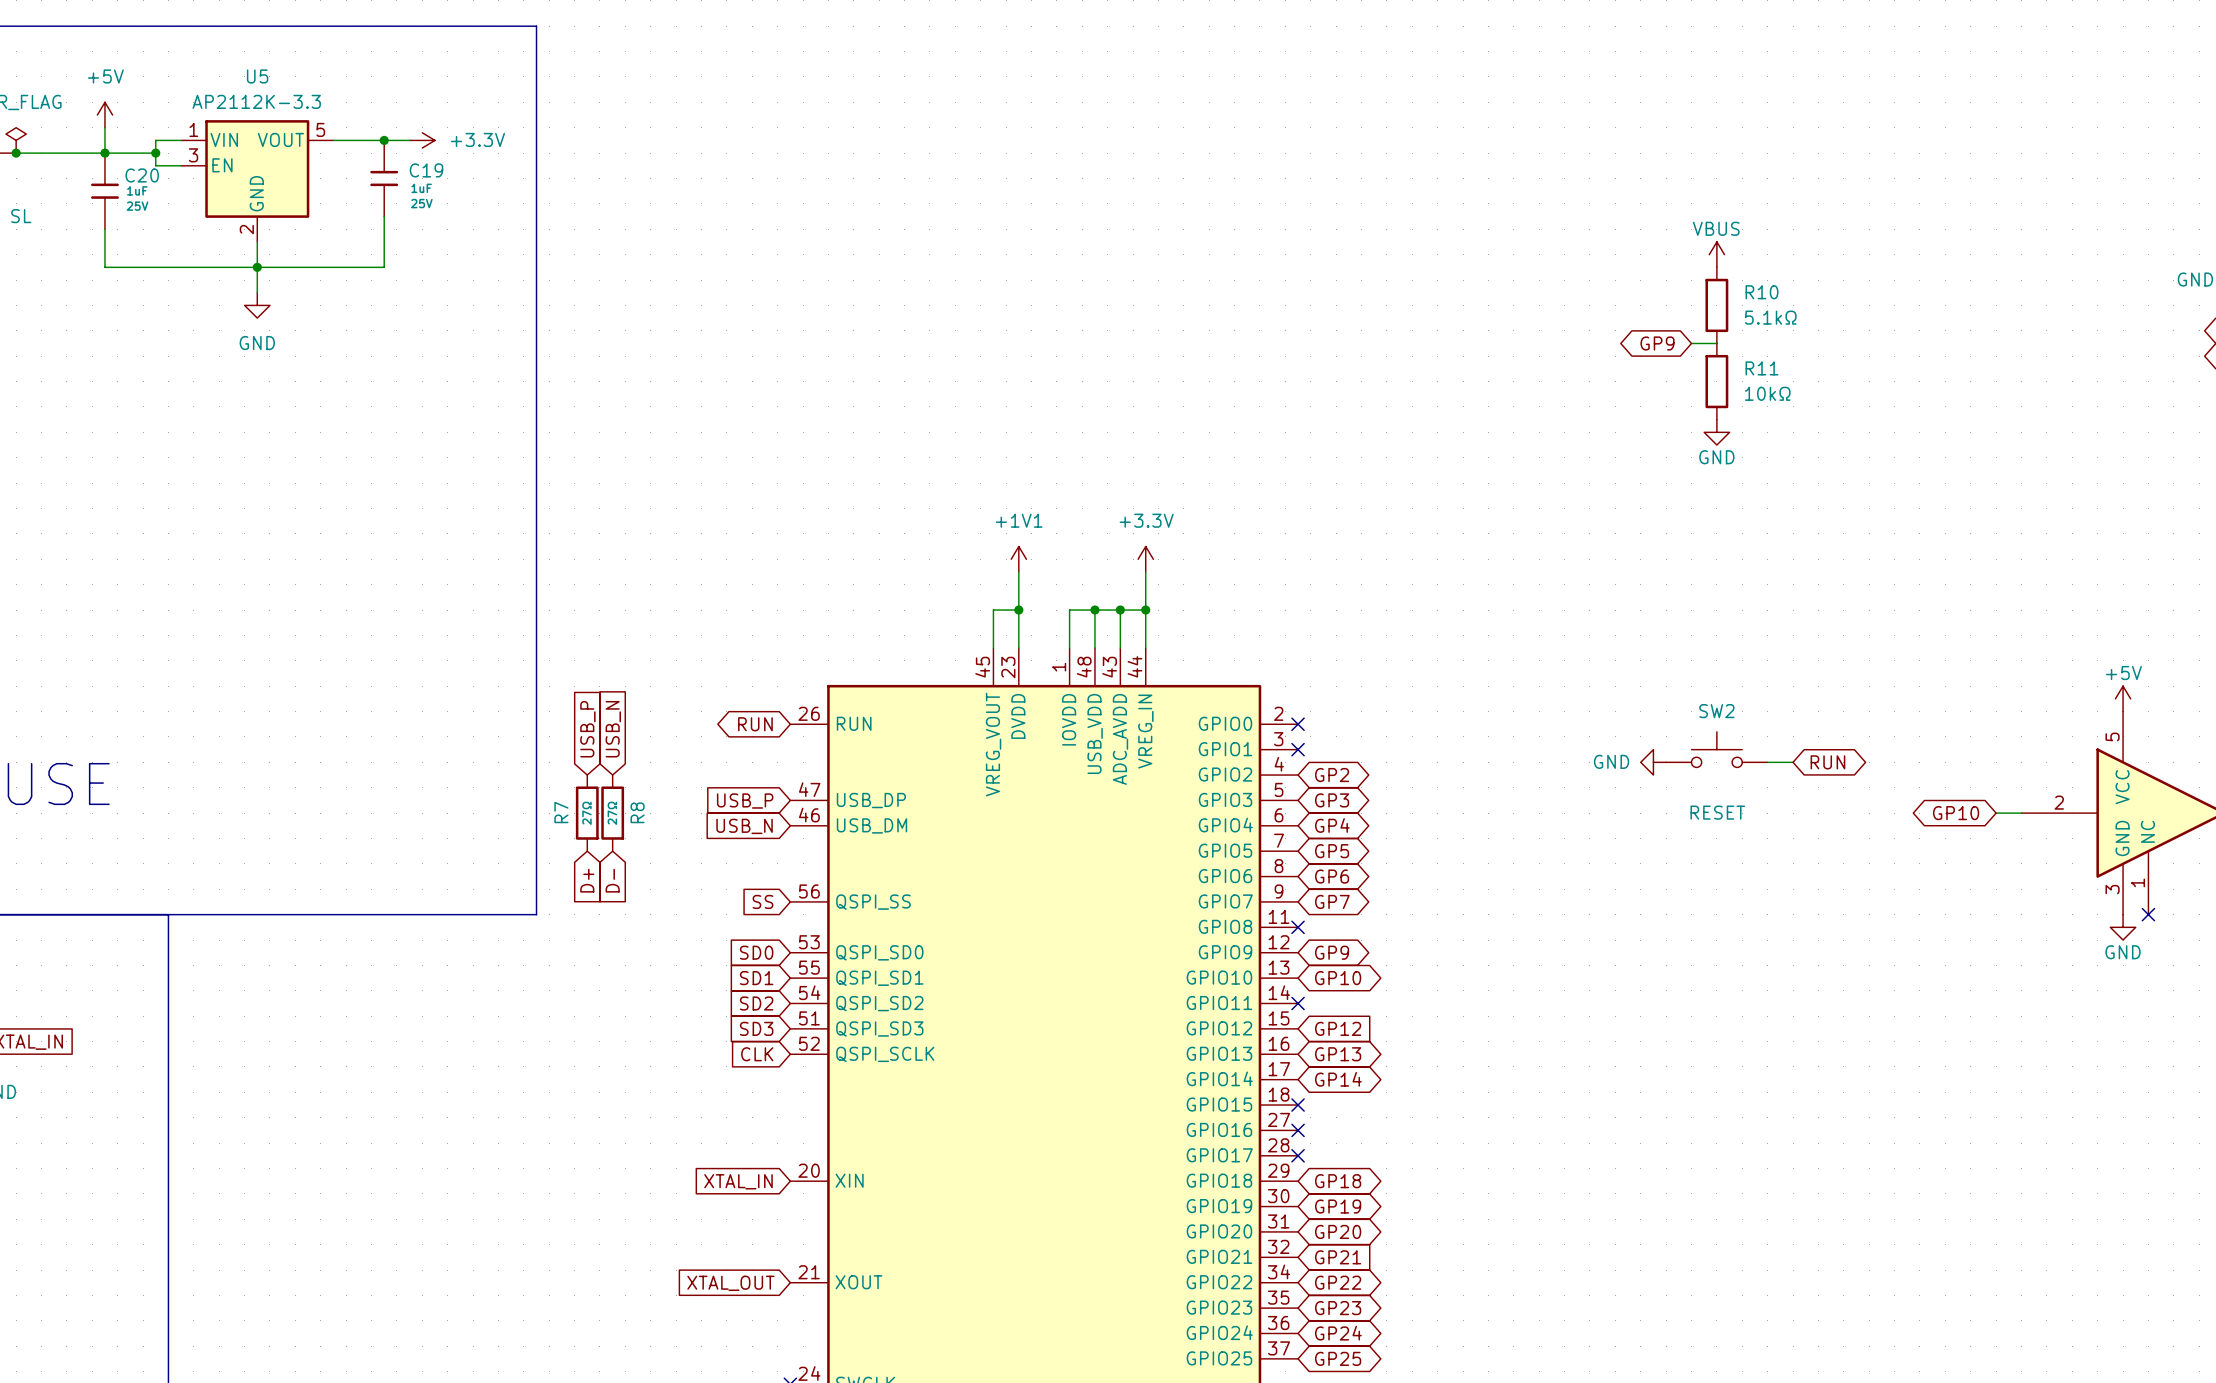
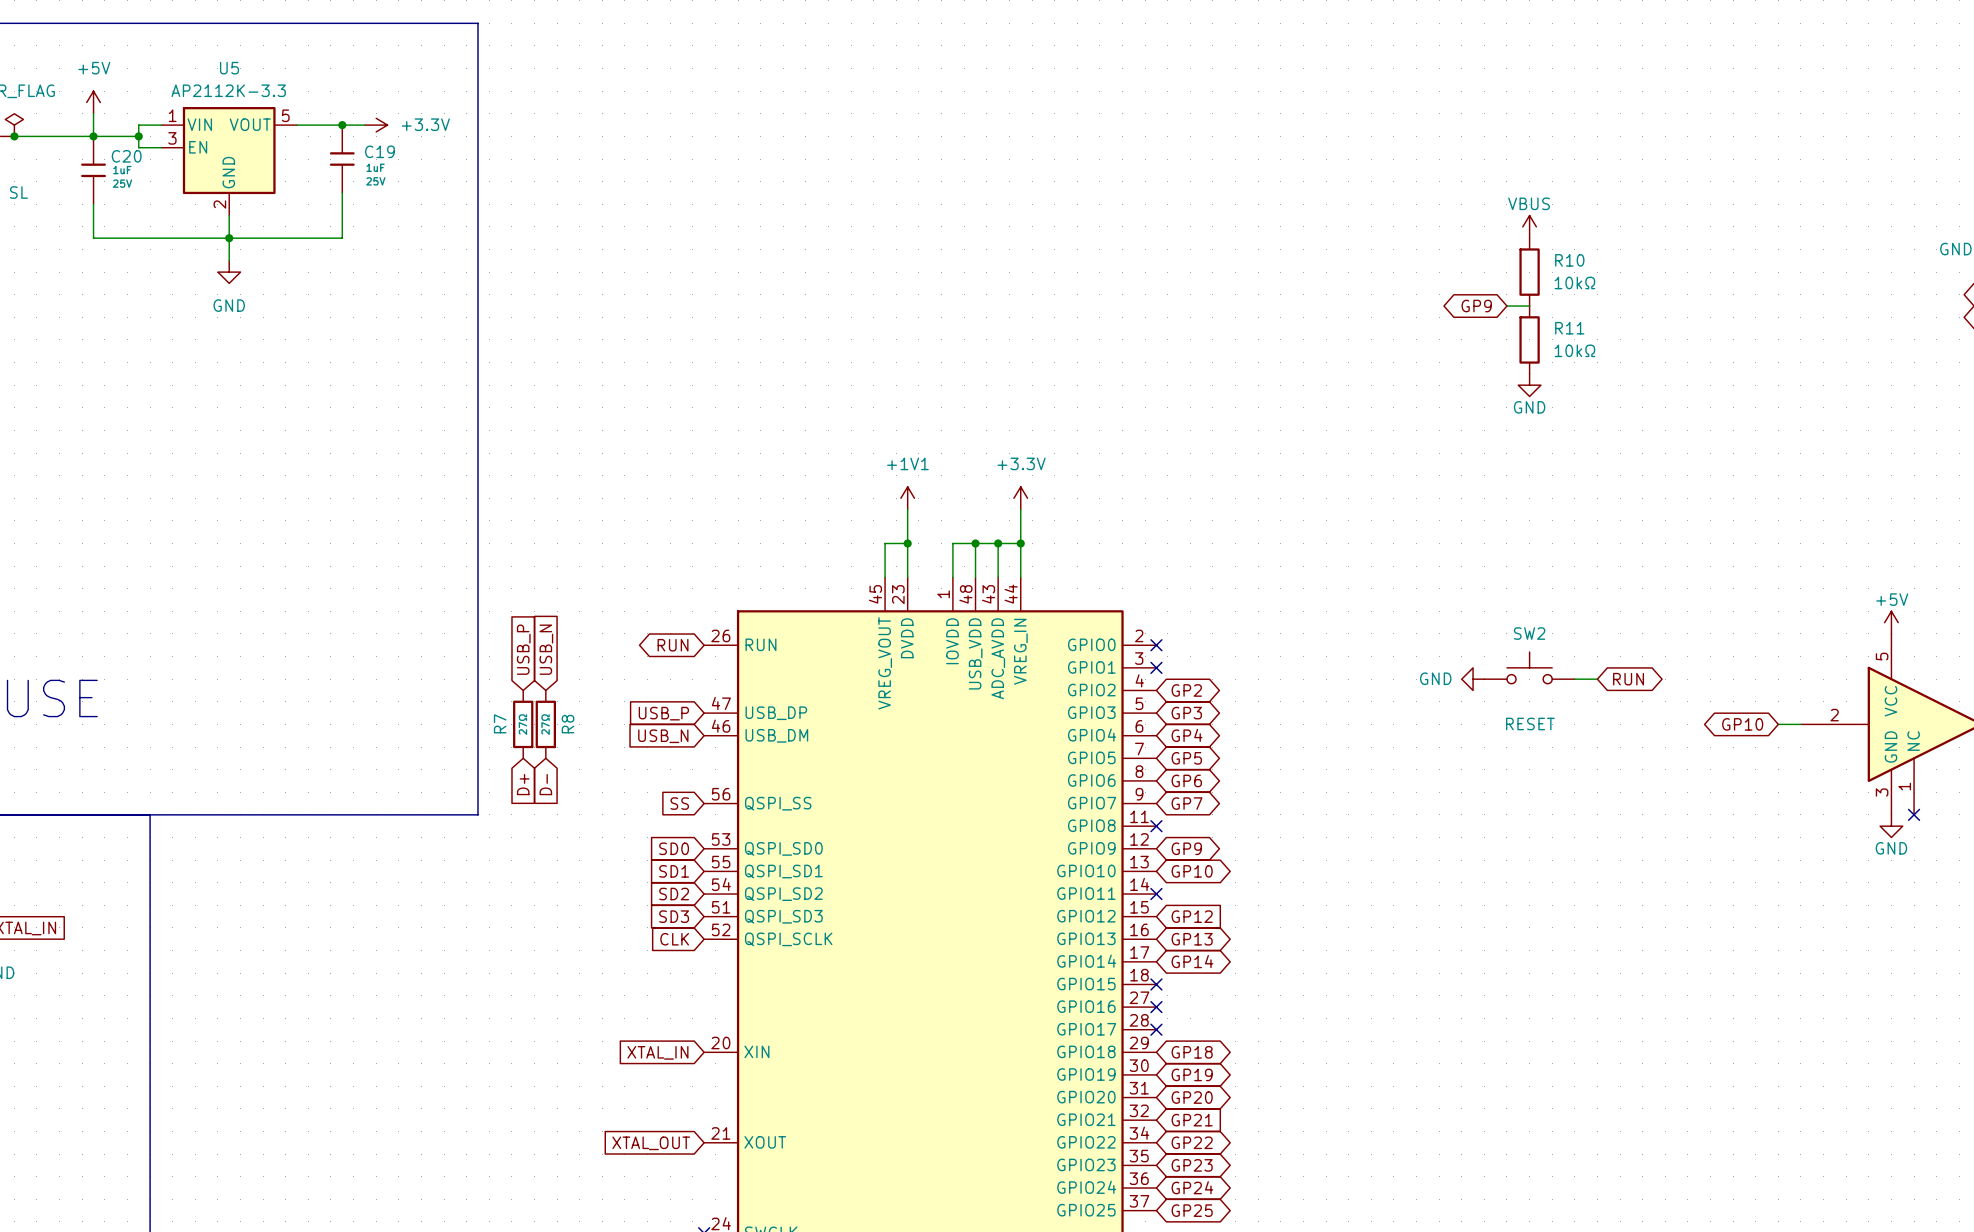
R10 value: 5.1kΩ (1770, 317) -> 10kΩ (1574, 282)

